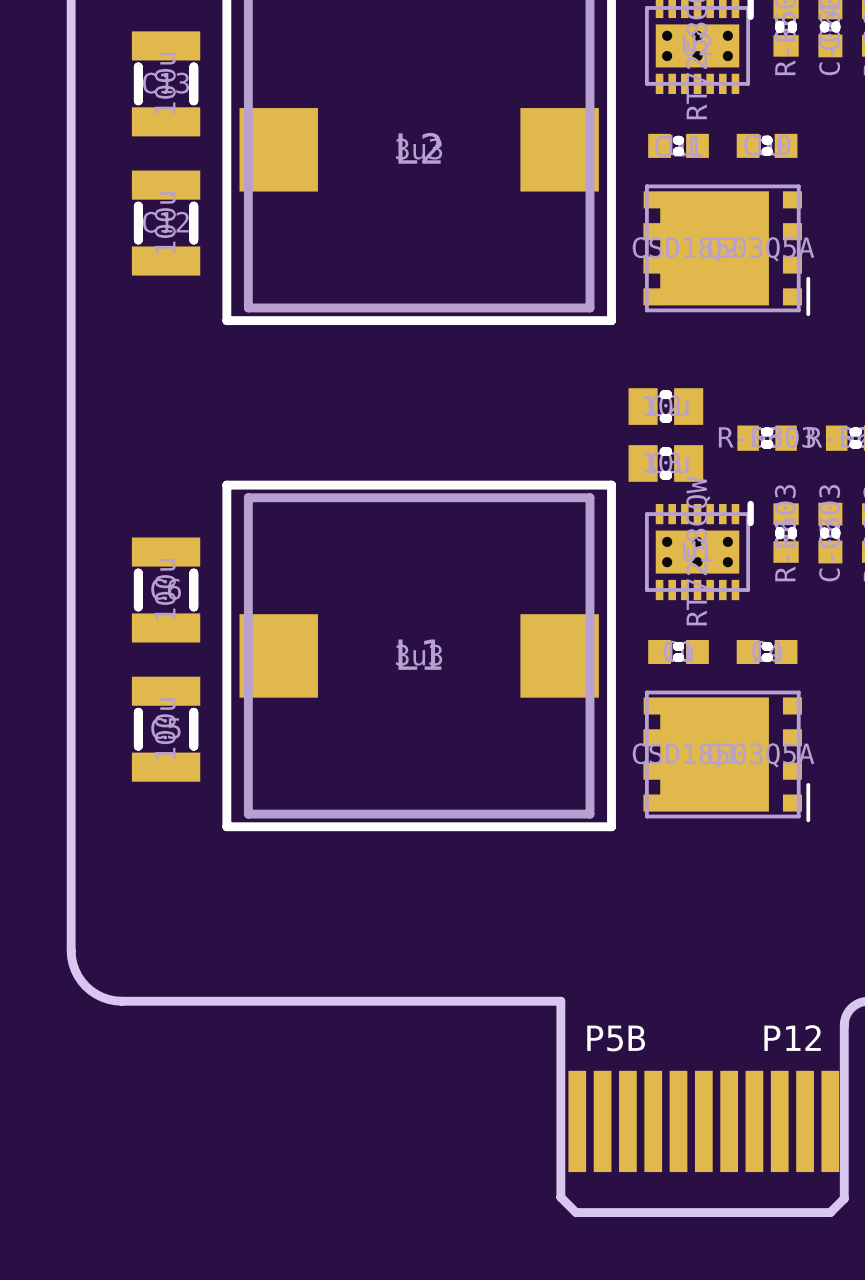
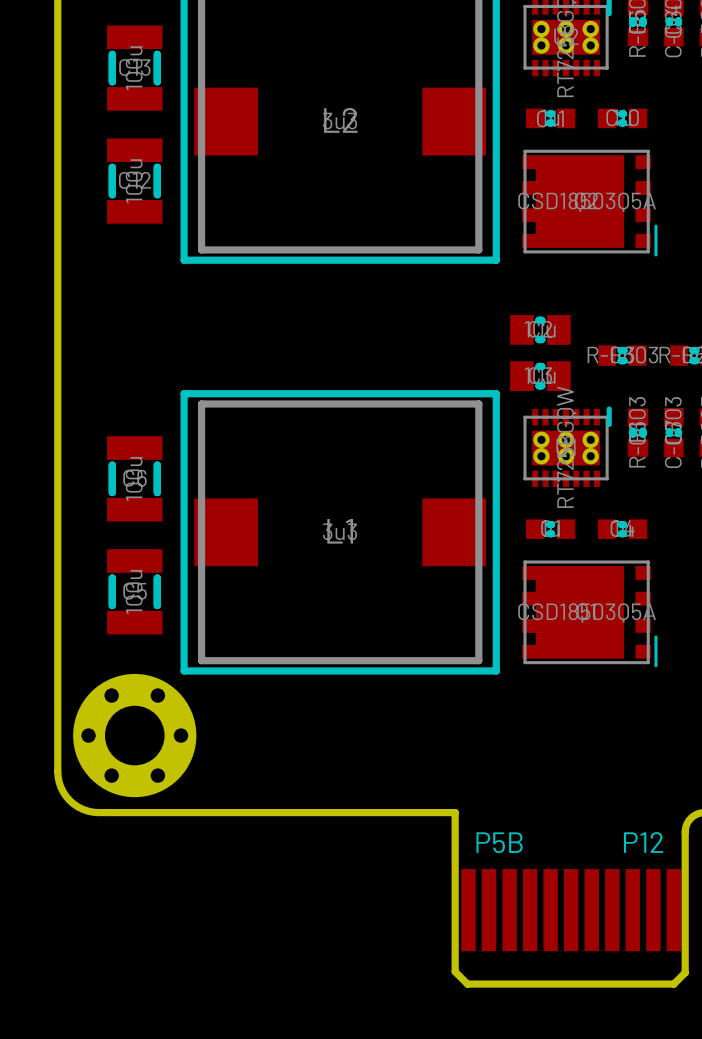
part: none -> (134, 735)

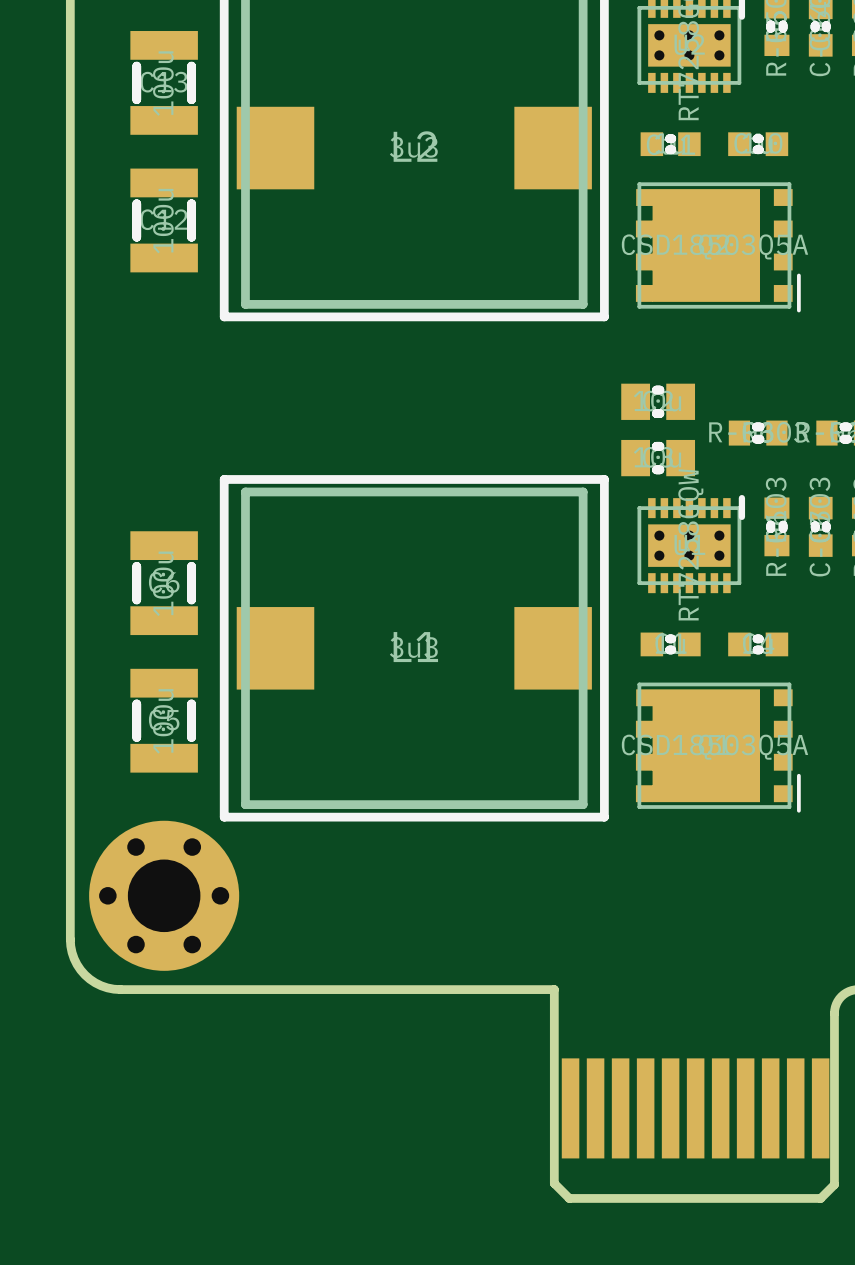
text: P5B (499, 842) -> none
text: P12 (643, 842) -> none

